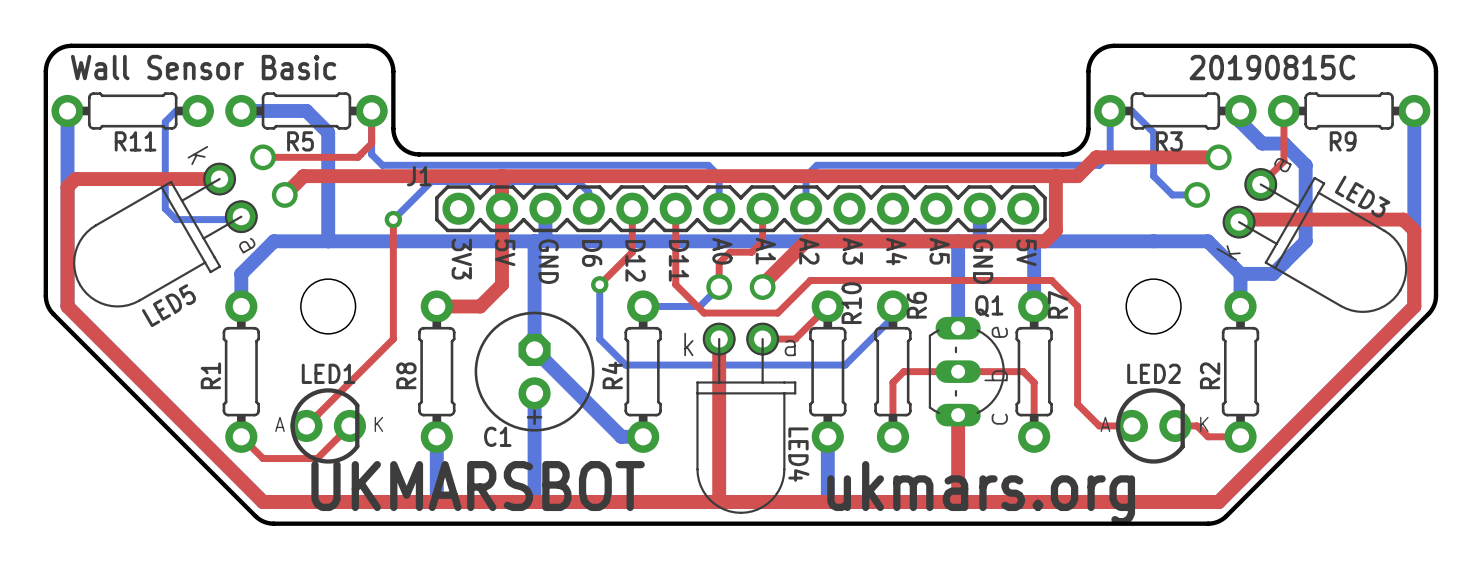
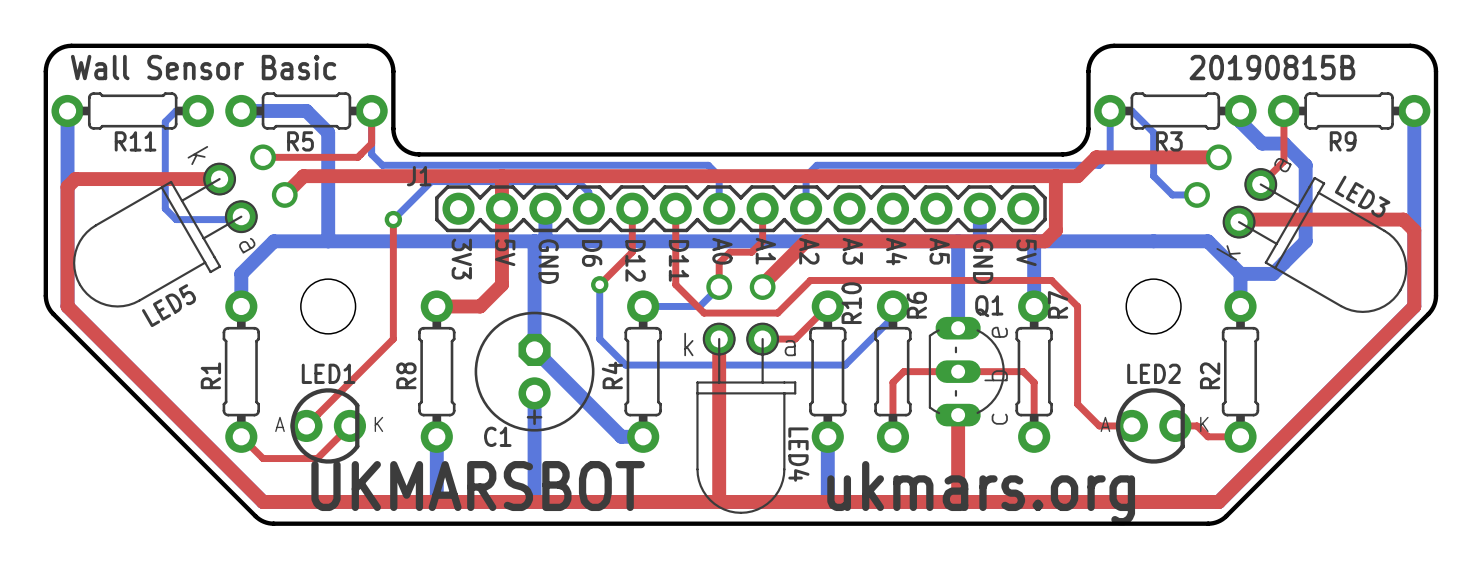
text: 20190815C (1272, 67) -> 20190815B (1272, 67)

